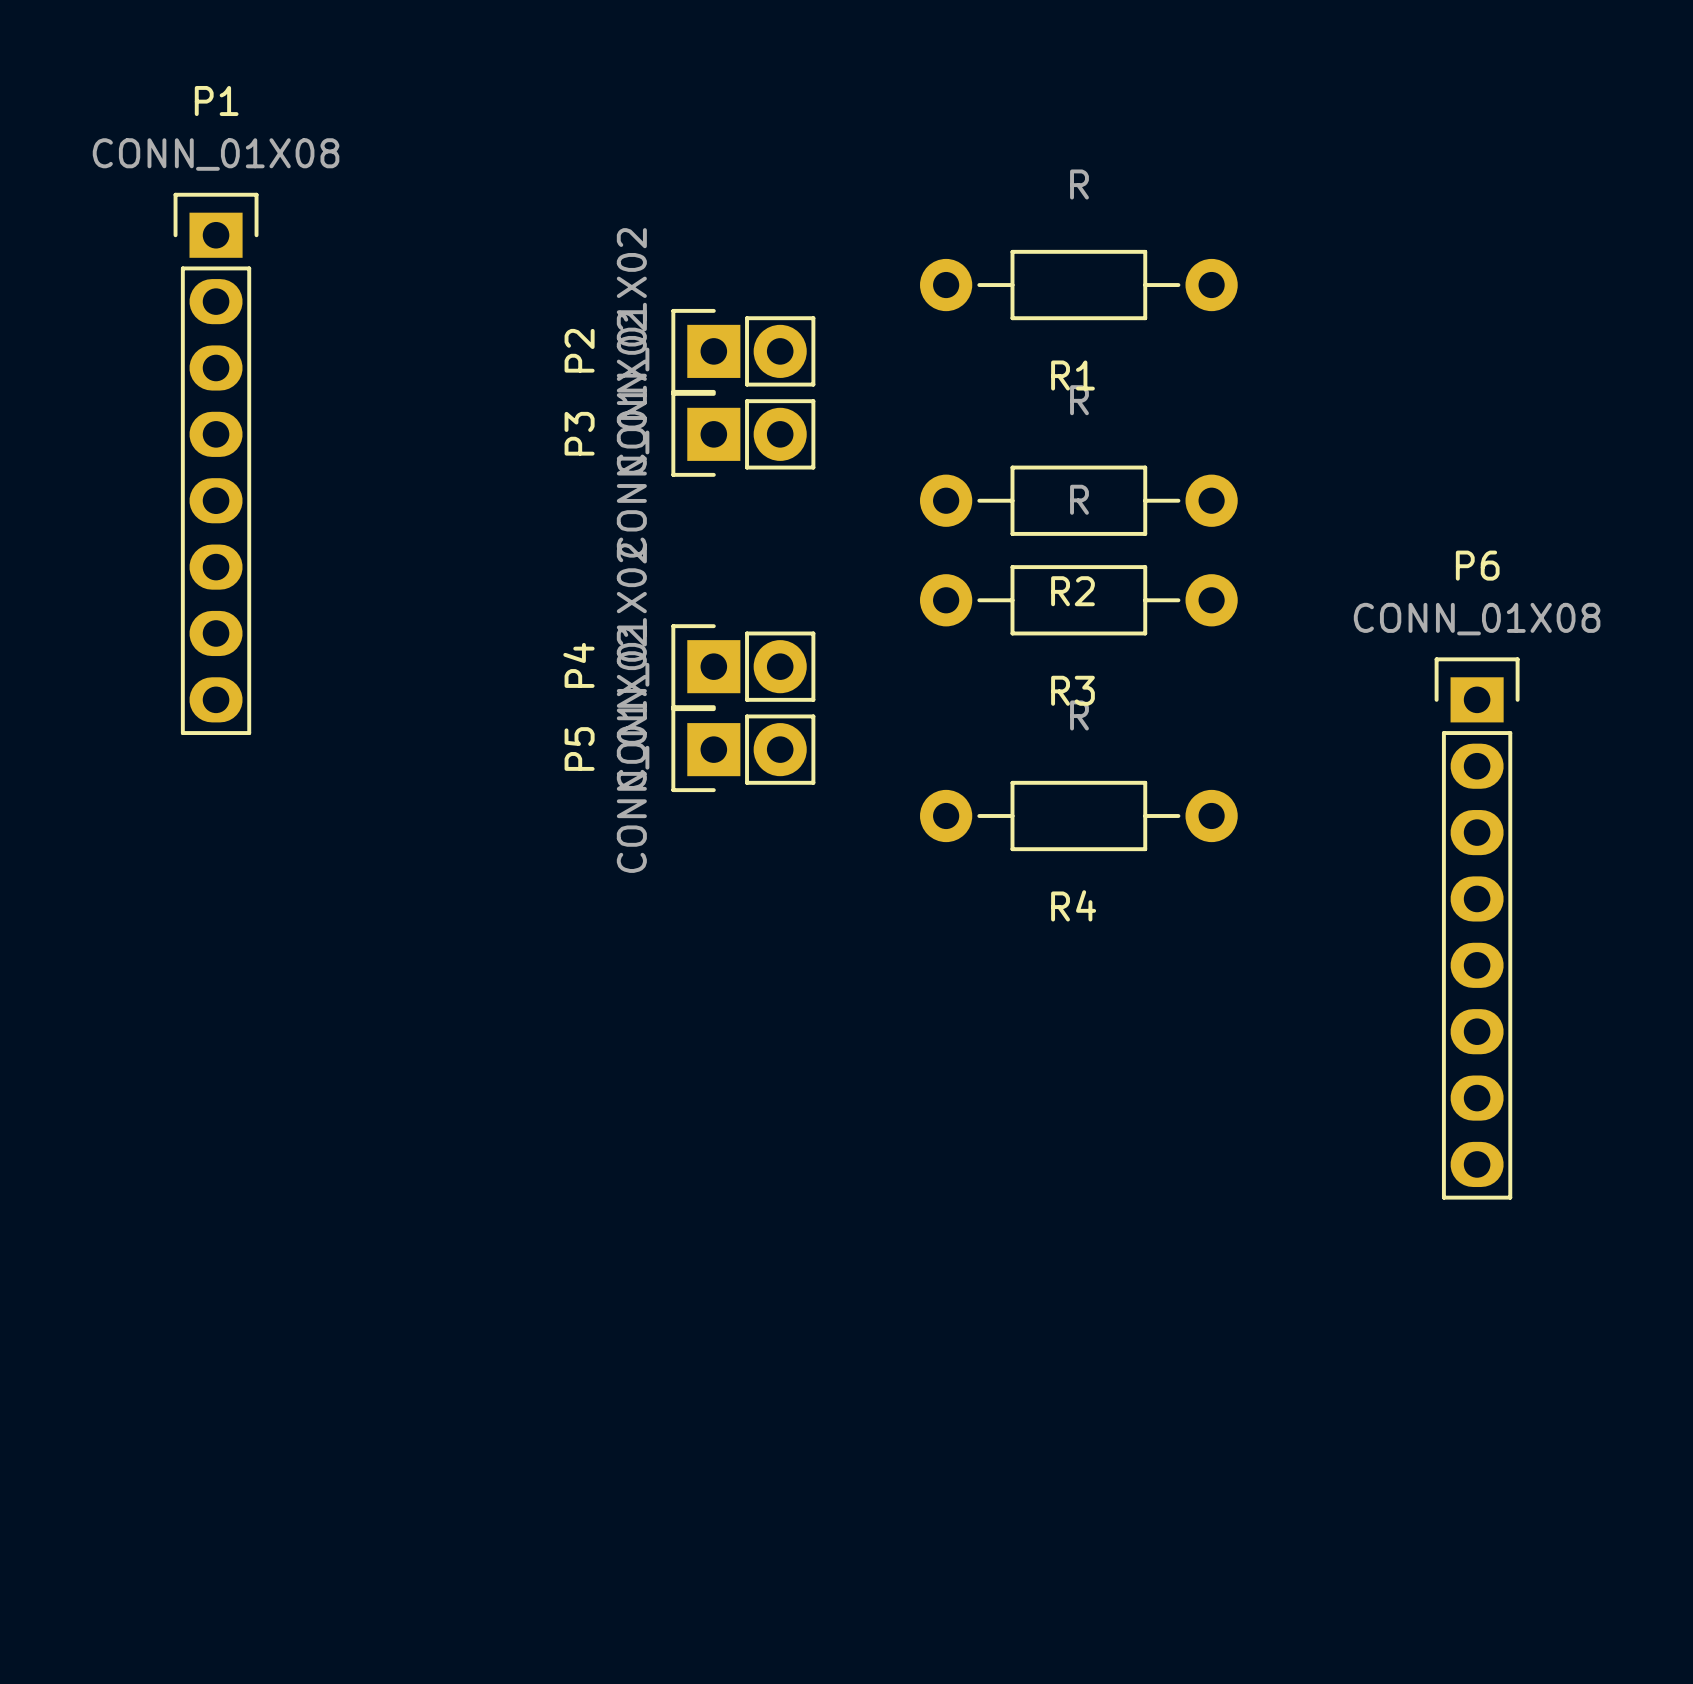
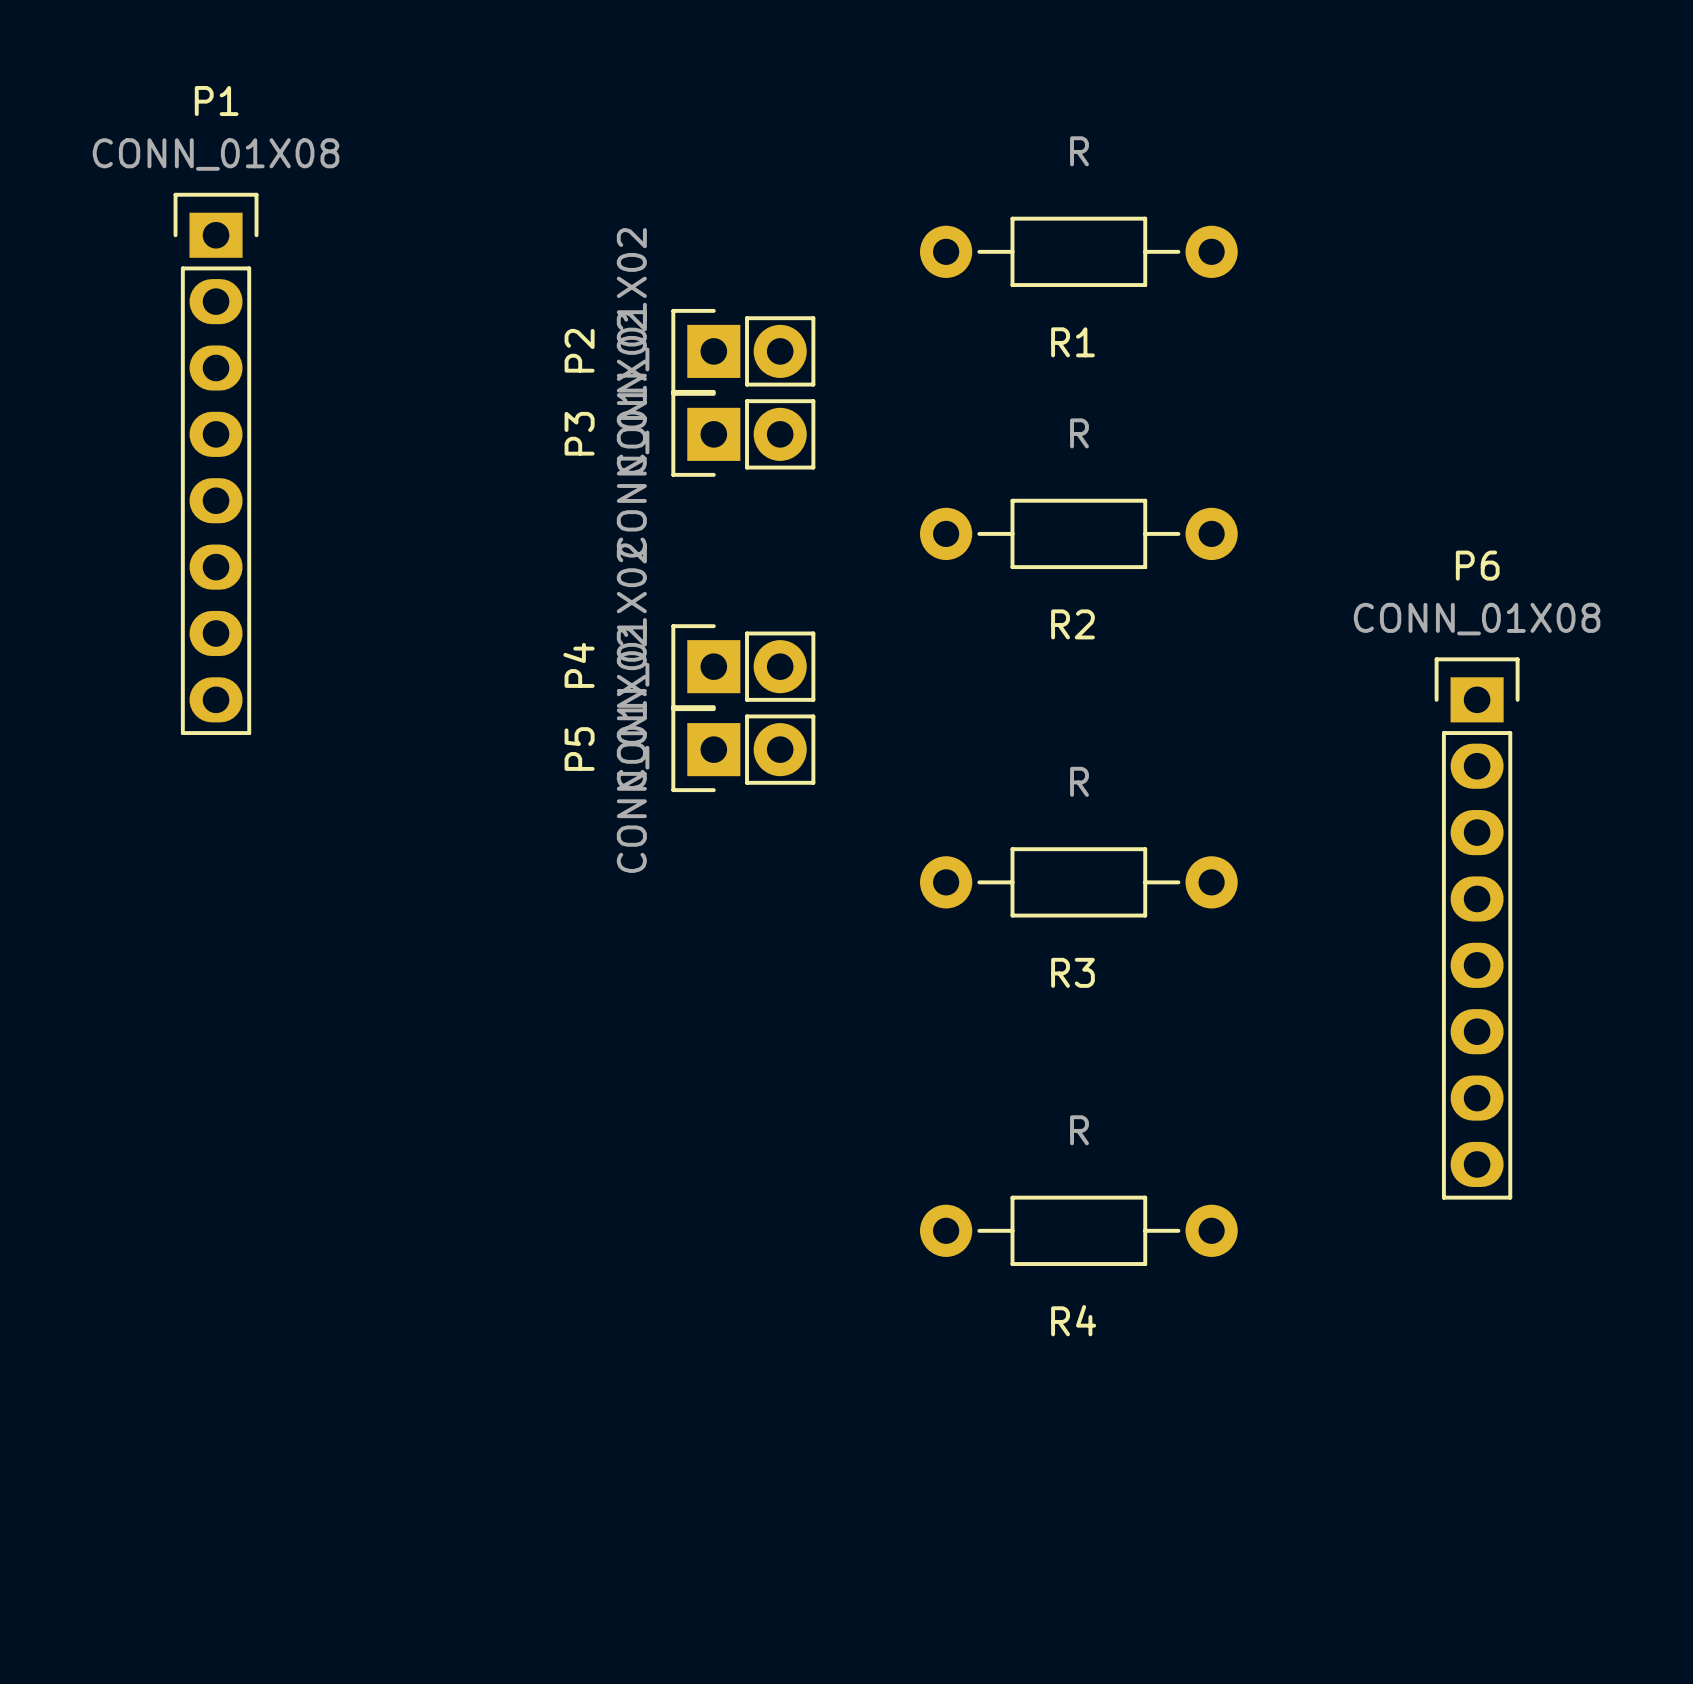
R1 position: (1078, 285) -> (1078, 251)
R2 position: (1078, 500) -> (1078, 533)
R3 position: (1078, 600) -> (1078, 882)
R4 position: (1078, 816) -> (1078, 1230)

